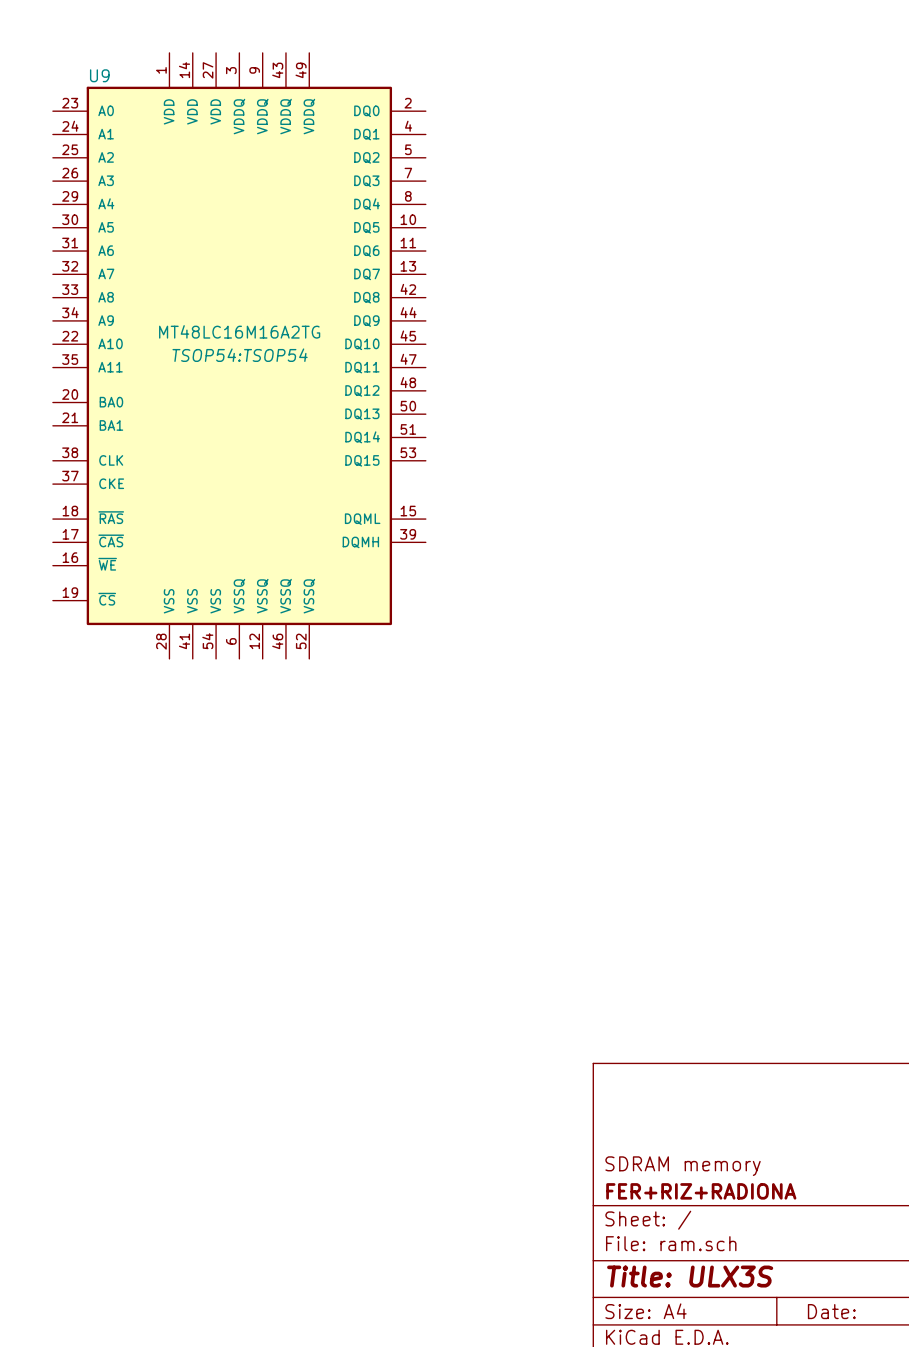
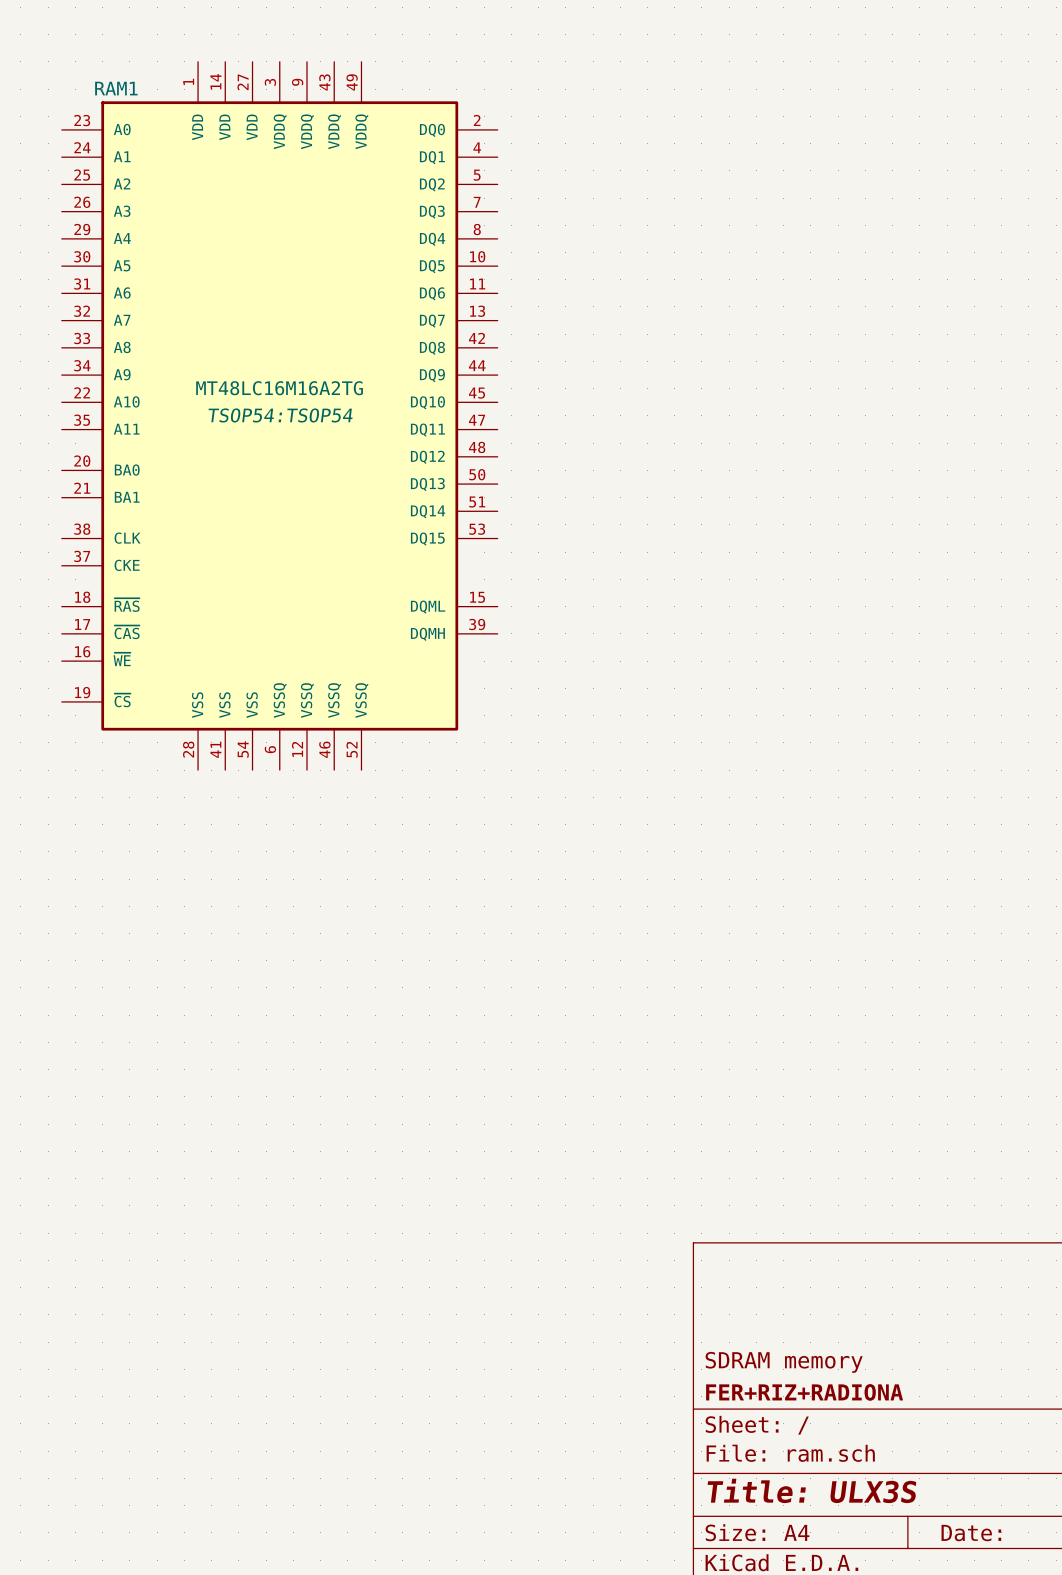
U9 name: U9 (99, 75) -> RAM1 (116, 88)

